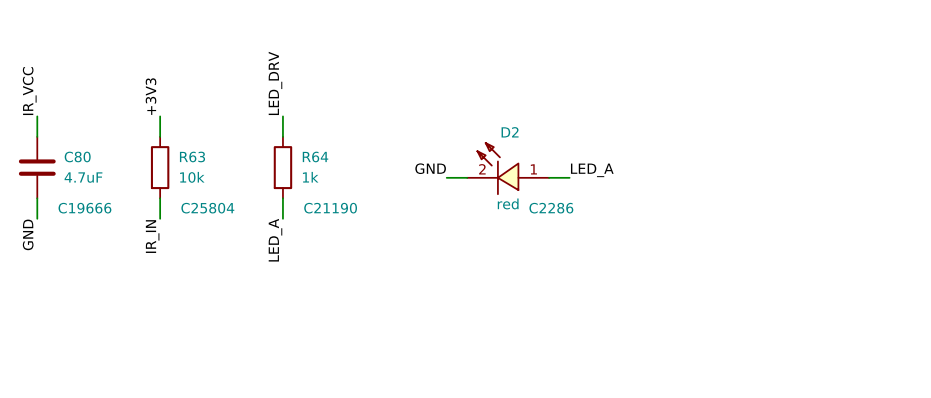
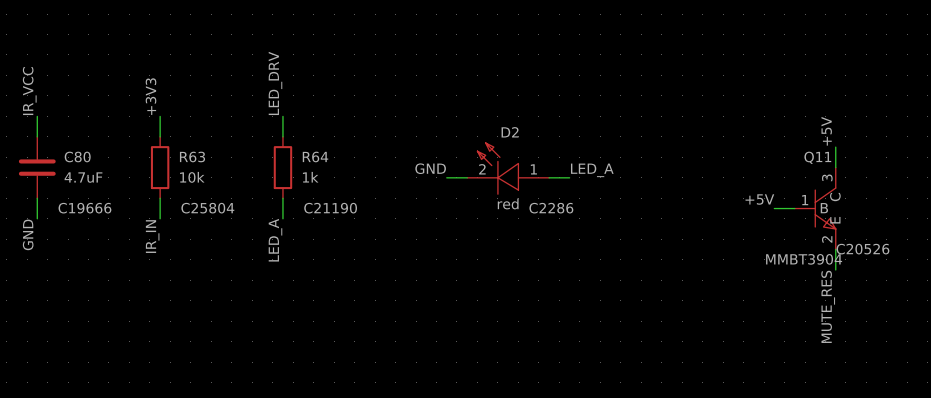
label: none -> +5V (826, 131)
wire: none -> (835, 147) (835, 167)
label: none -> +5V (759, 199)
wire: none -> (774, 208) (794, 208)
Q11: none -> MMBT3904 (815, 208)
wire: none -> (835, 249) (835, 269)
label: none -> MUTE_RES (828, 306)

